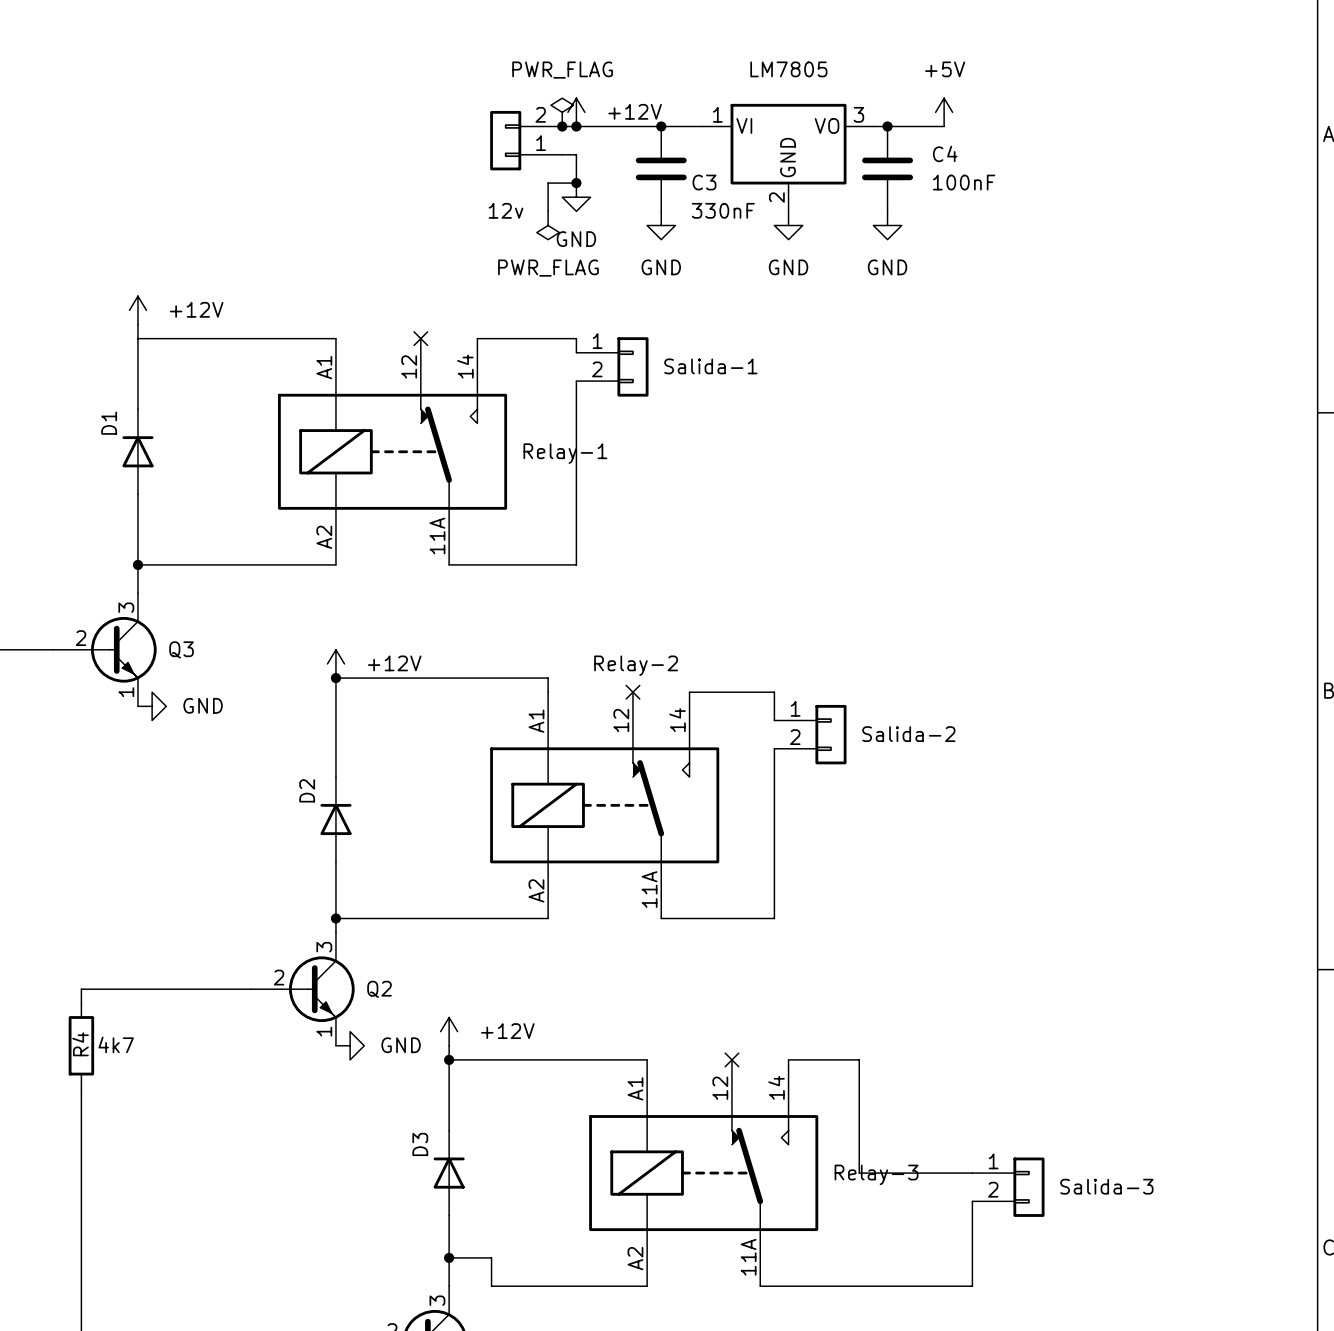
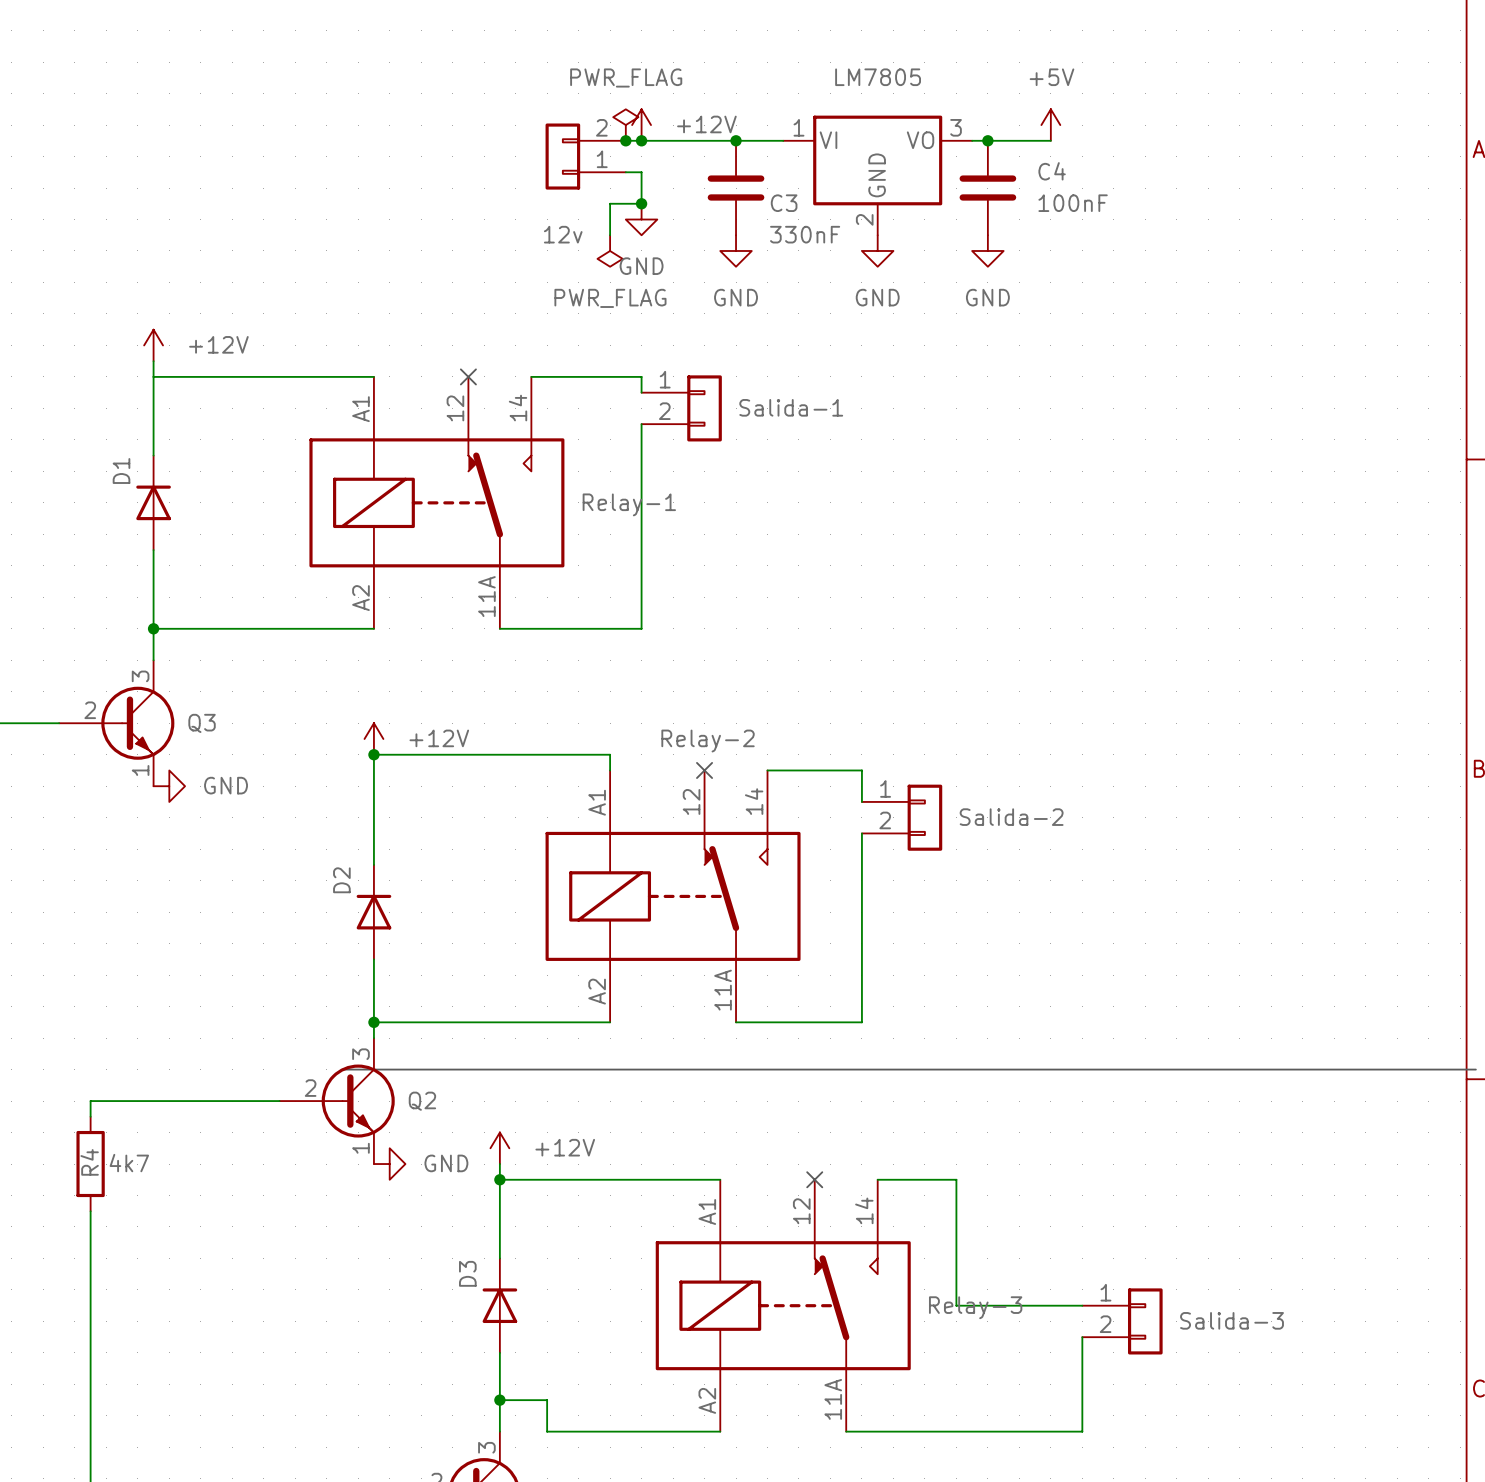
line: none -> (342, 1069) (1475, 1069)

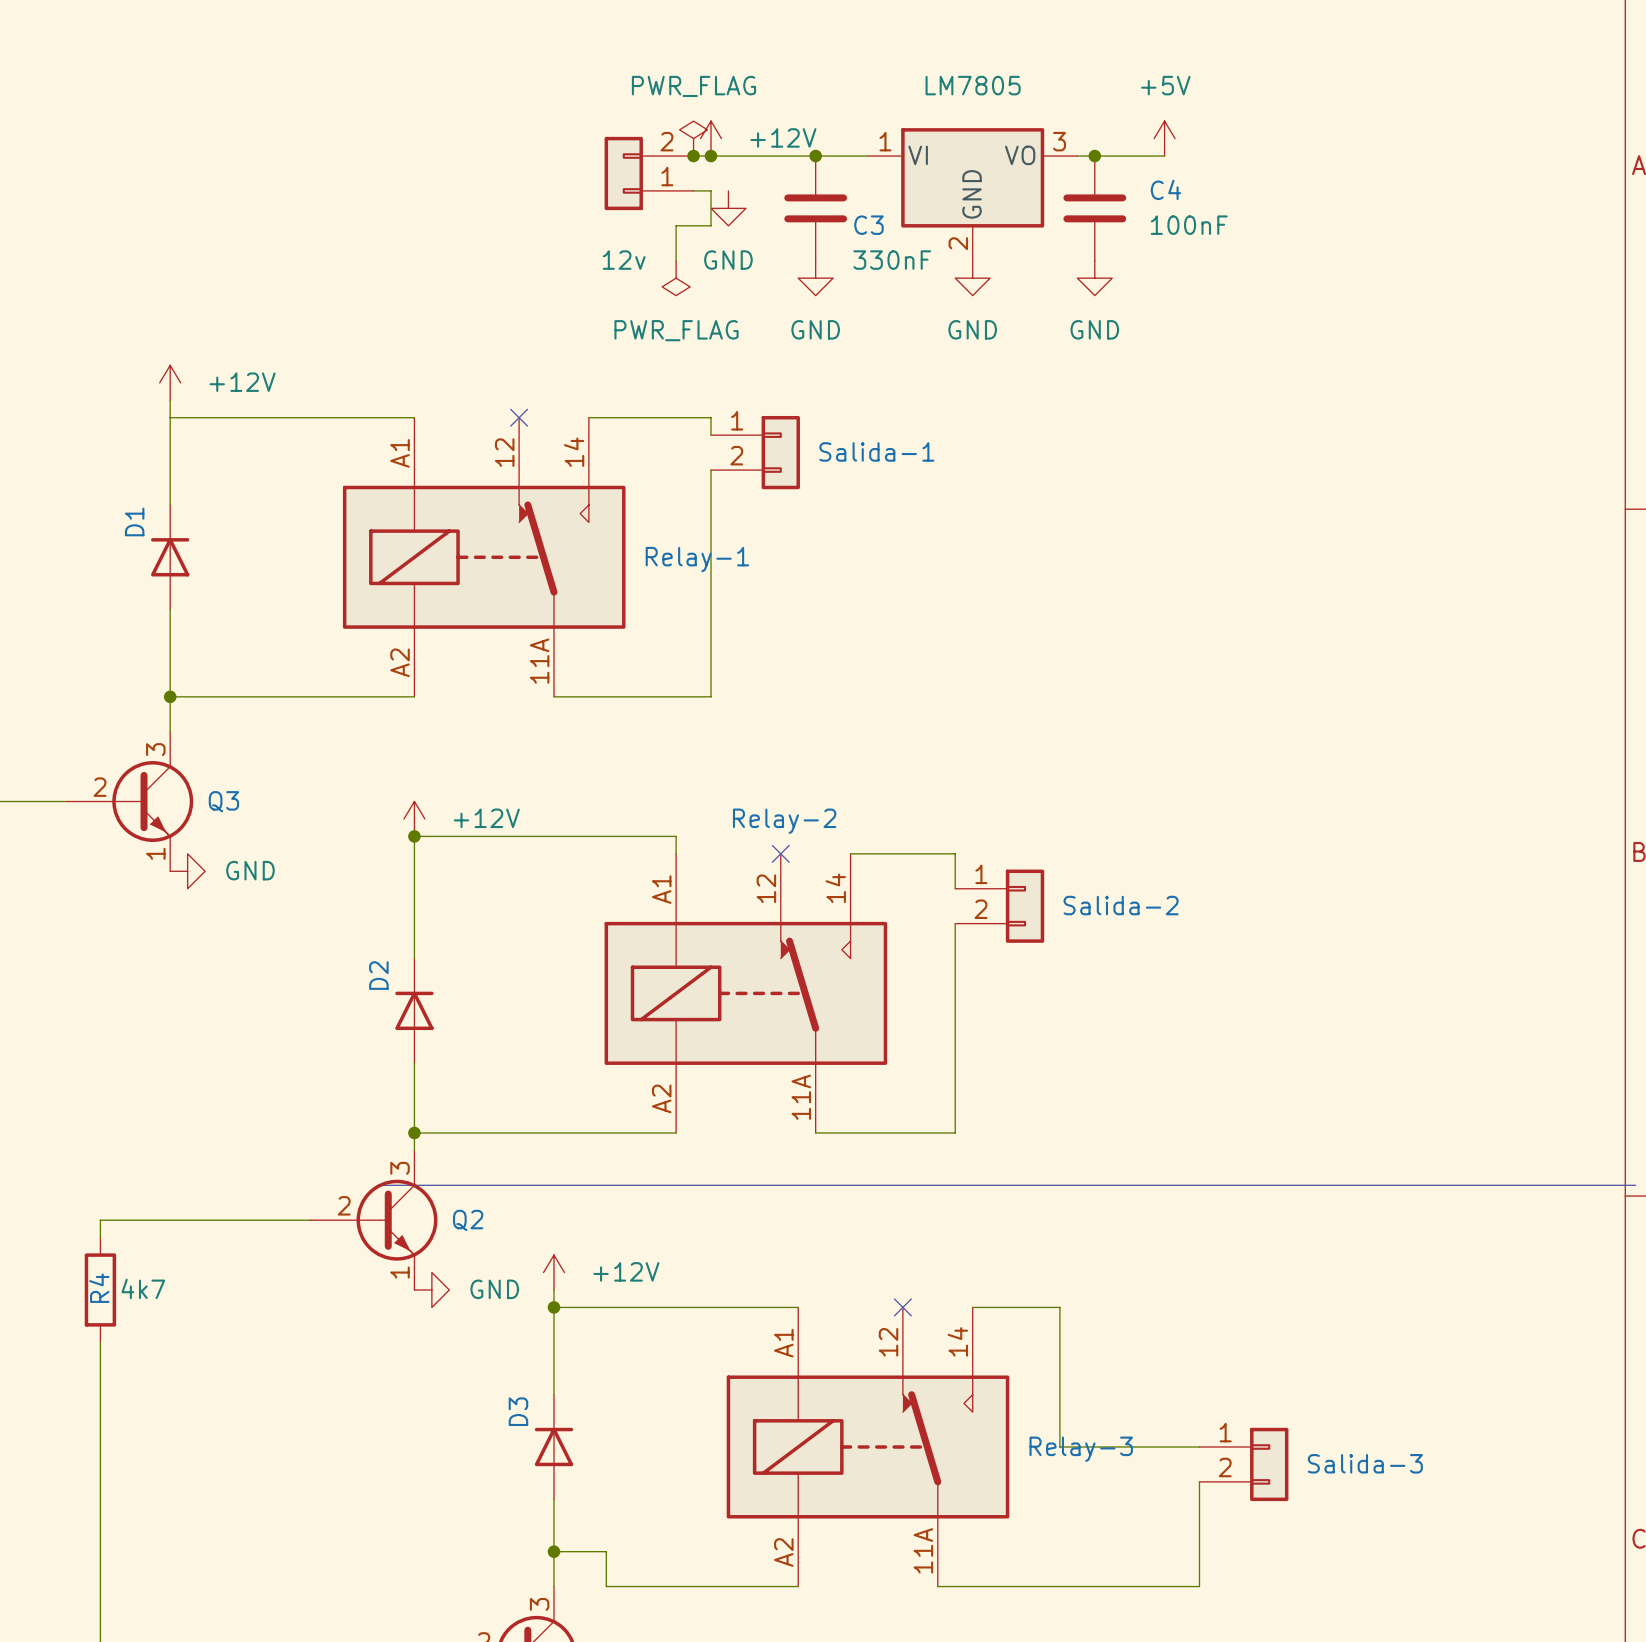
junction: (641, 203) -> none
power symbol position: GND (641, 219) -> GND (728, 208)

